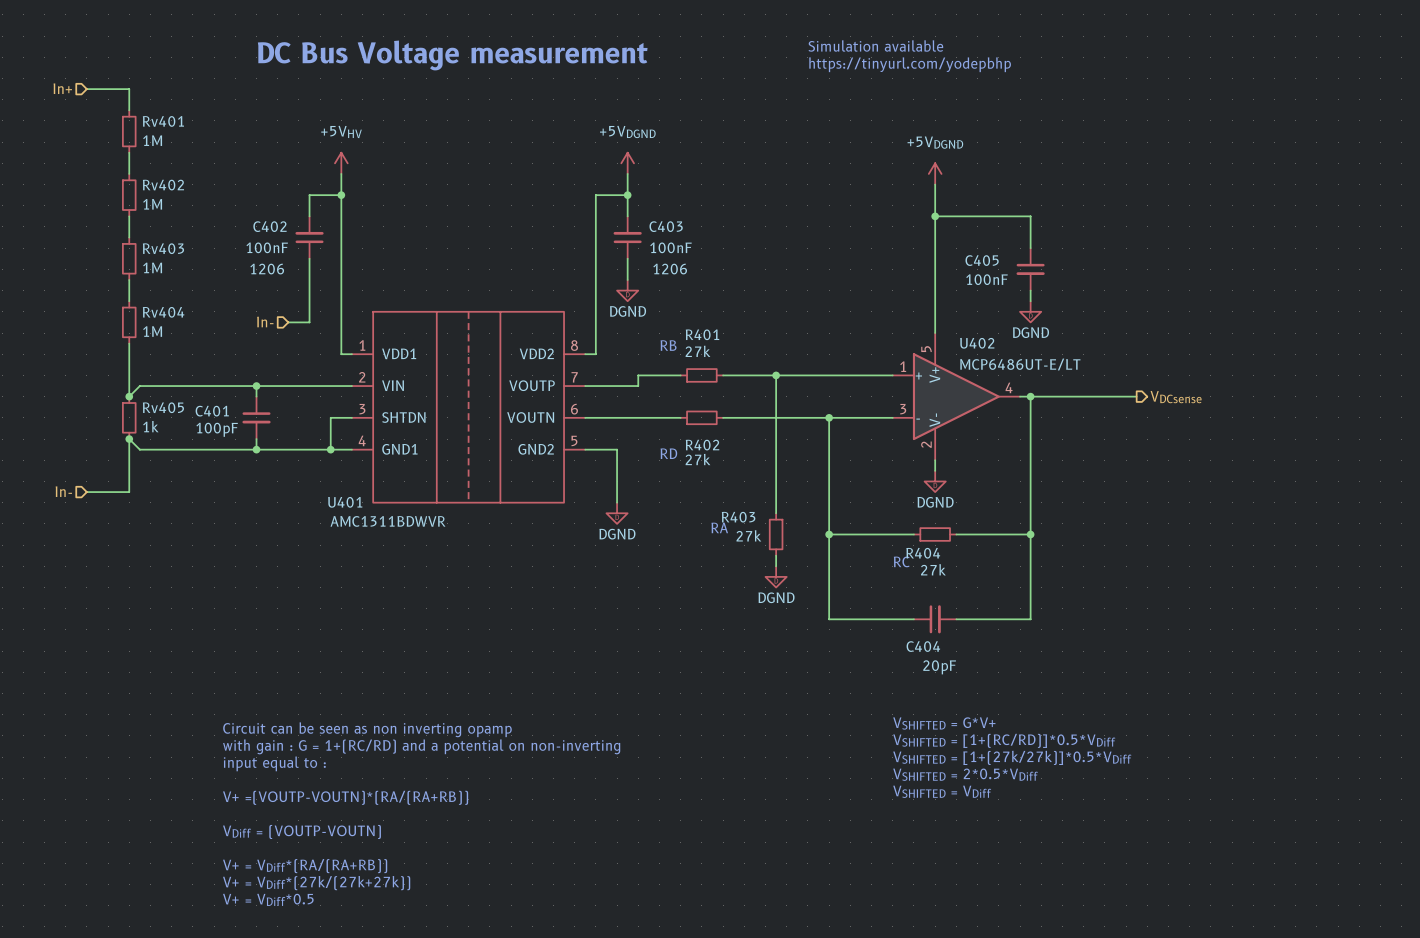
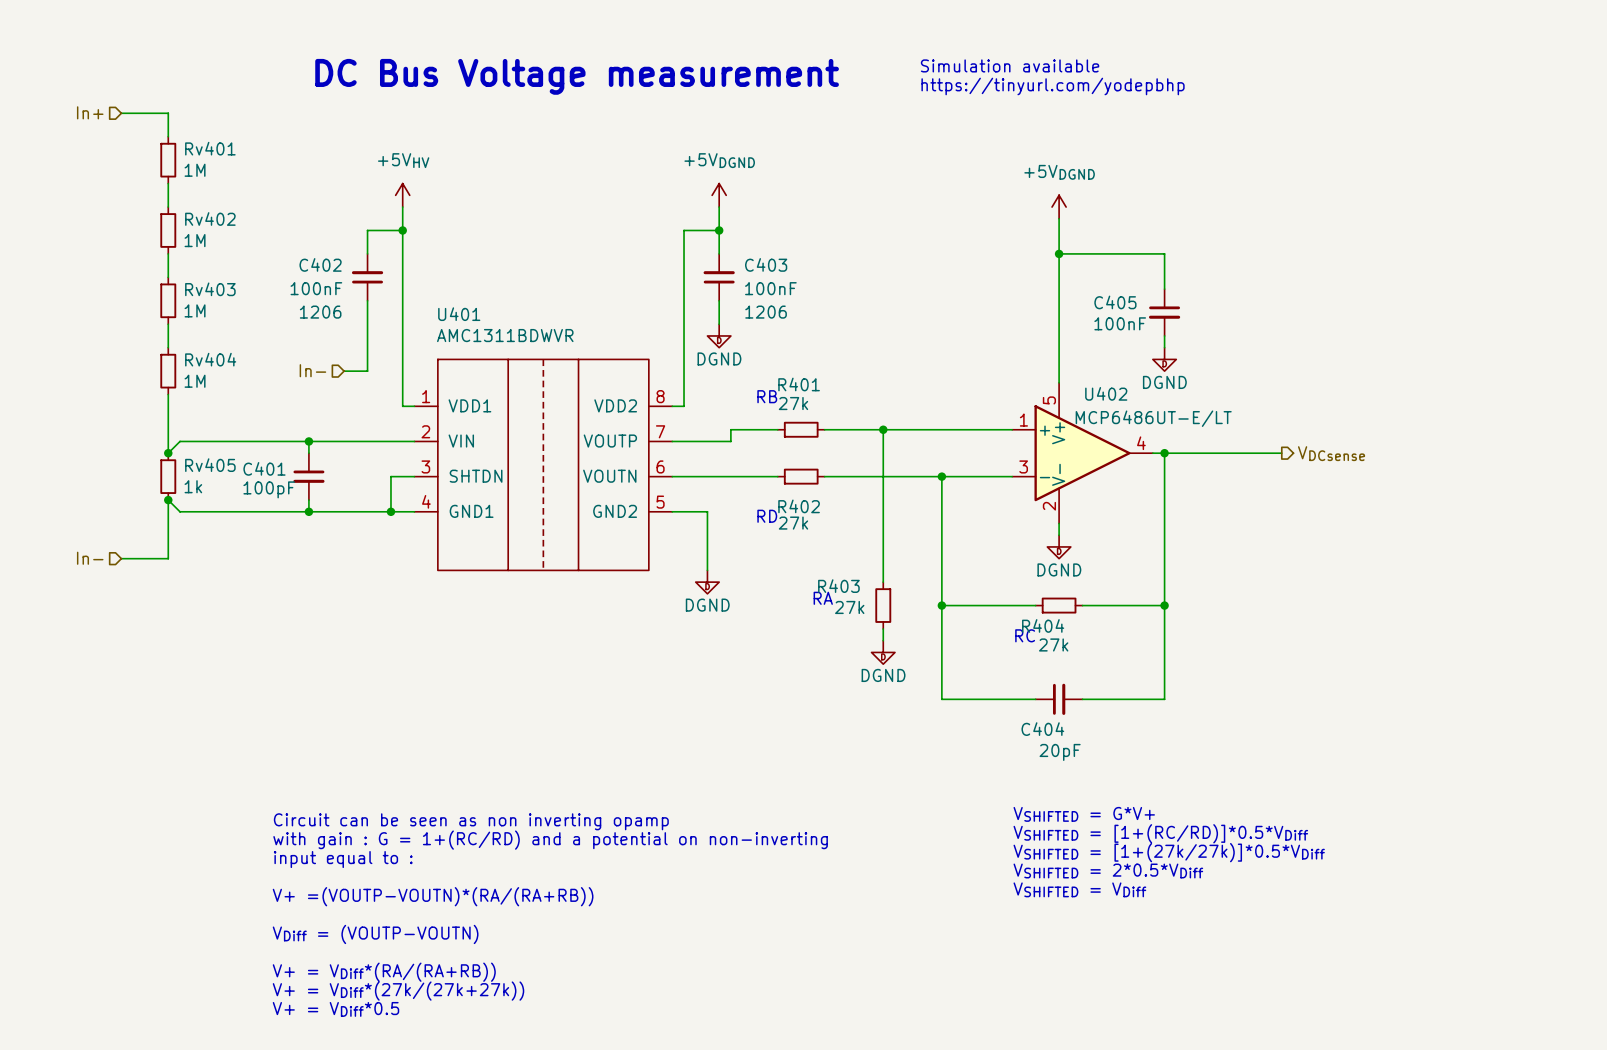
U401 name position: U401 (345, 502) -> U401 (459, 314)
U401 value position: AMC1311BDWVR (387, 521) -> AMC1311BDWVR (505, 335)

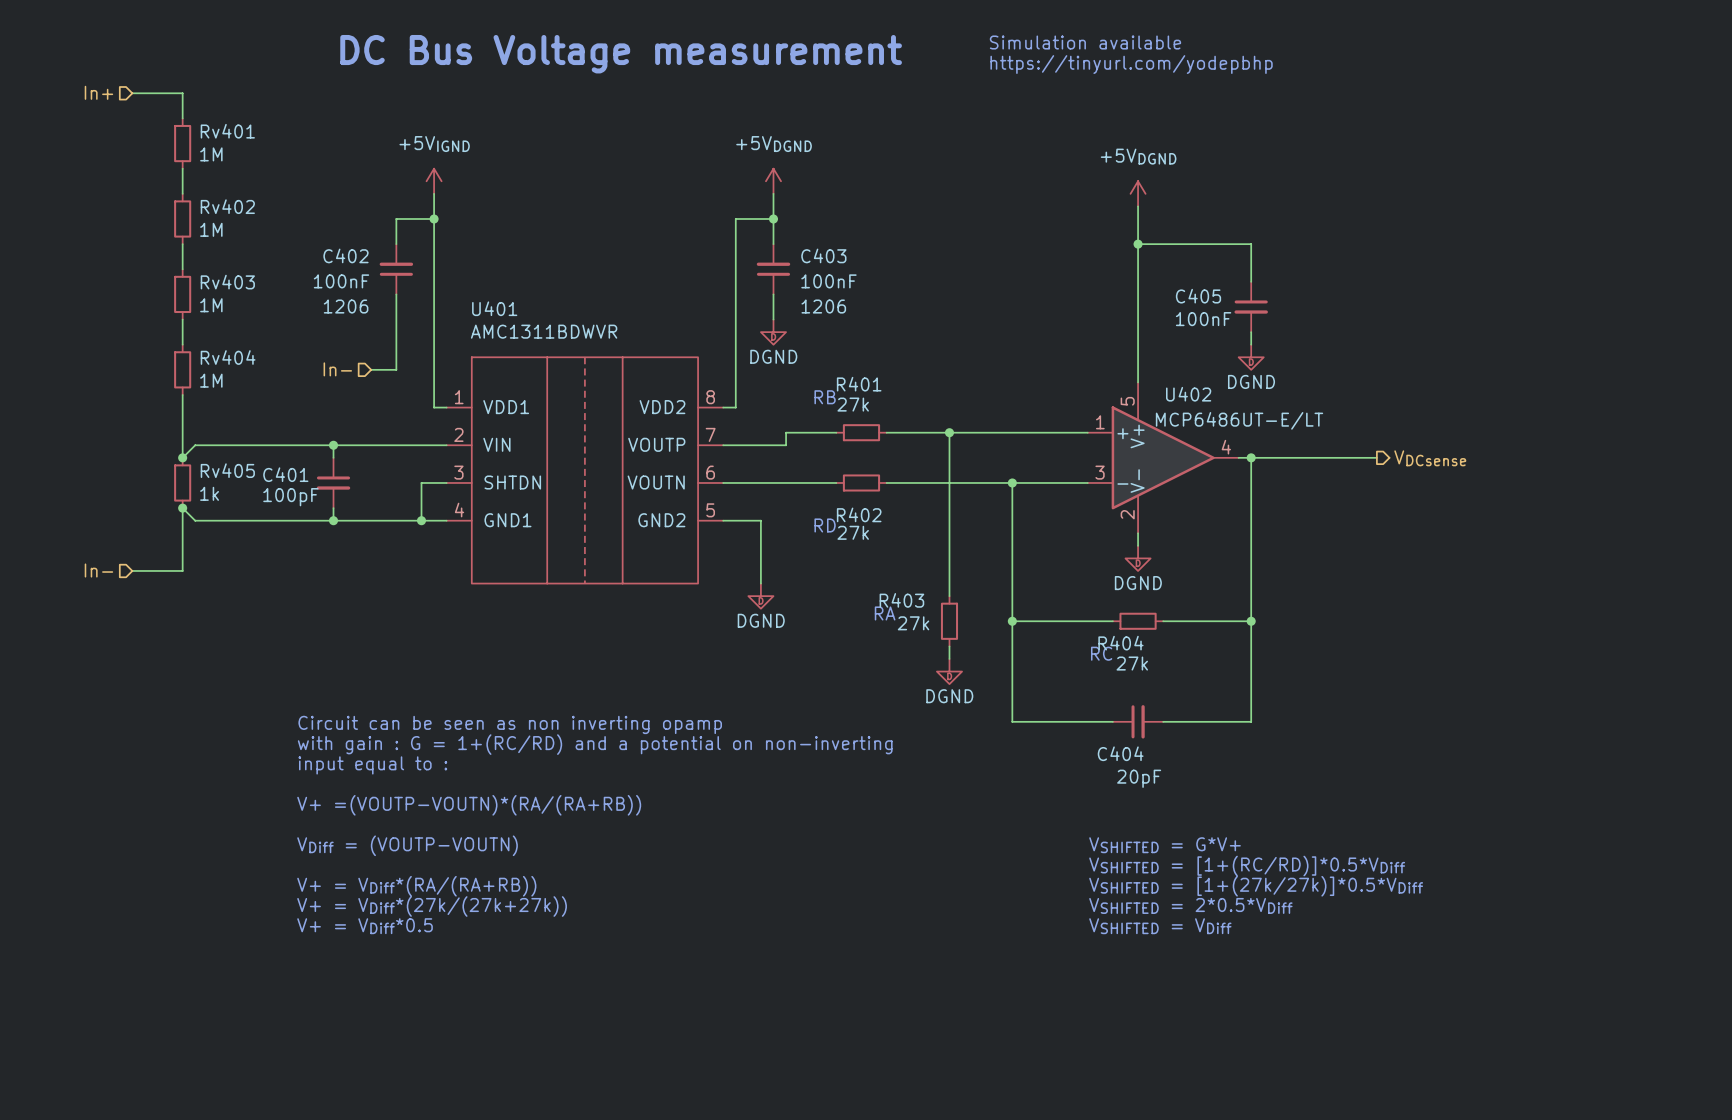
power symbol: +5VHV (402, 195) -> +5VIGND (434, 181)
text: none -> Circuit can be seen as non inverting opamp (510, 724)
text: none -> V+ =(VOUTP-VOUTN)*(RA/(RA+RB)) (469, 805)
text: Circuit can be seen as non inverting opamp (471, 821) -> VDiff = (VOUTP-VOUTN) (407, 845)
text position: with gain : G = 1+(RC/RD) and a potential on non-inverting (550, 840) -> with gain : G = 1+(RC/RD) and a potential on non-inverting (595, 744)
text position: input equal to : (343, 859) -> input equal to : (372, 765)
text: V+ =(VOUTP-VOUTN)*(RA/(RA+RB)) (433, 896) -> V+ = VDiff*0.5 (365, 926)
text: VDiff = (VOUTP-VOUTN) (375, 934) -> none
text position: V+ = VDiff*(RA/(RA+RB)) (384, 972) -> V+ = VDiff*(RA/(RA+RB)) (416, 886)
text position: V+ = VDiff*(27k/(27k+27k)) (398, 991) -> V+ = VDiff*(27k/(27k+27k)) (432, 906)
text: V+ = VDiff*0.5 (335, 1009) -> none

